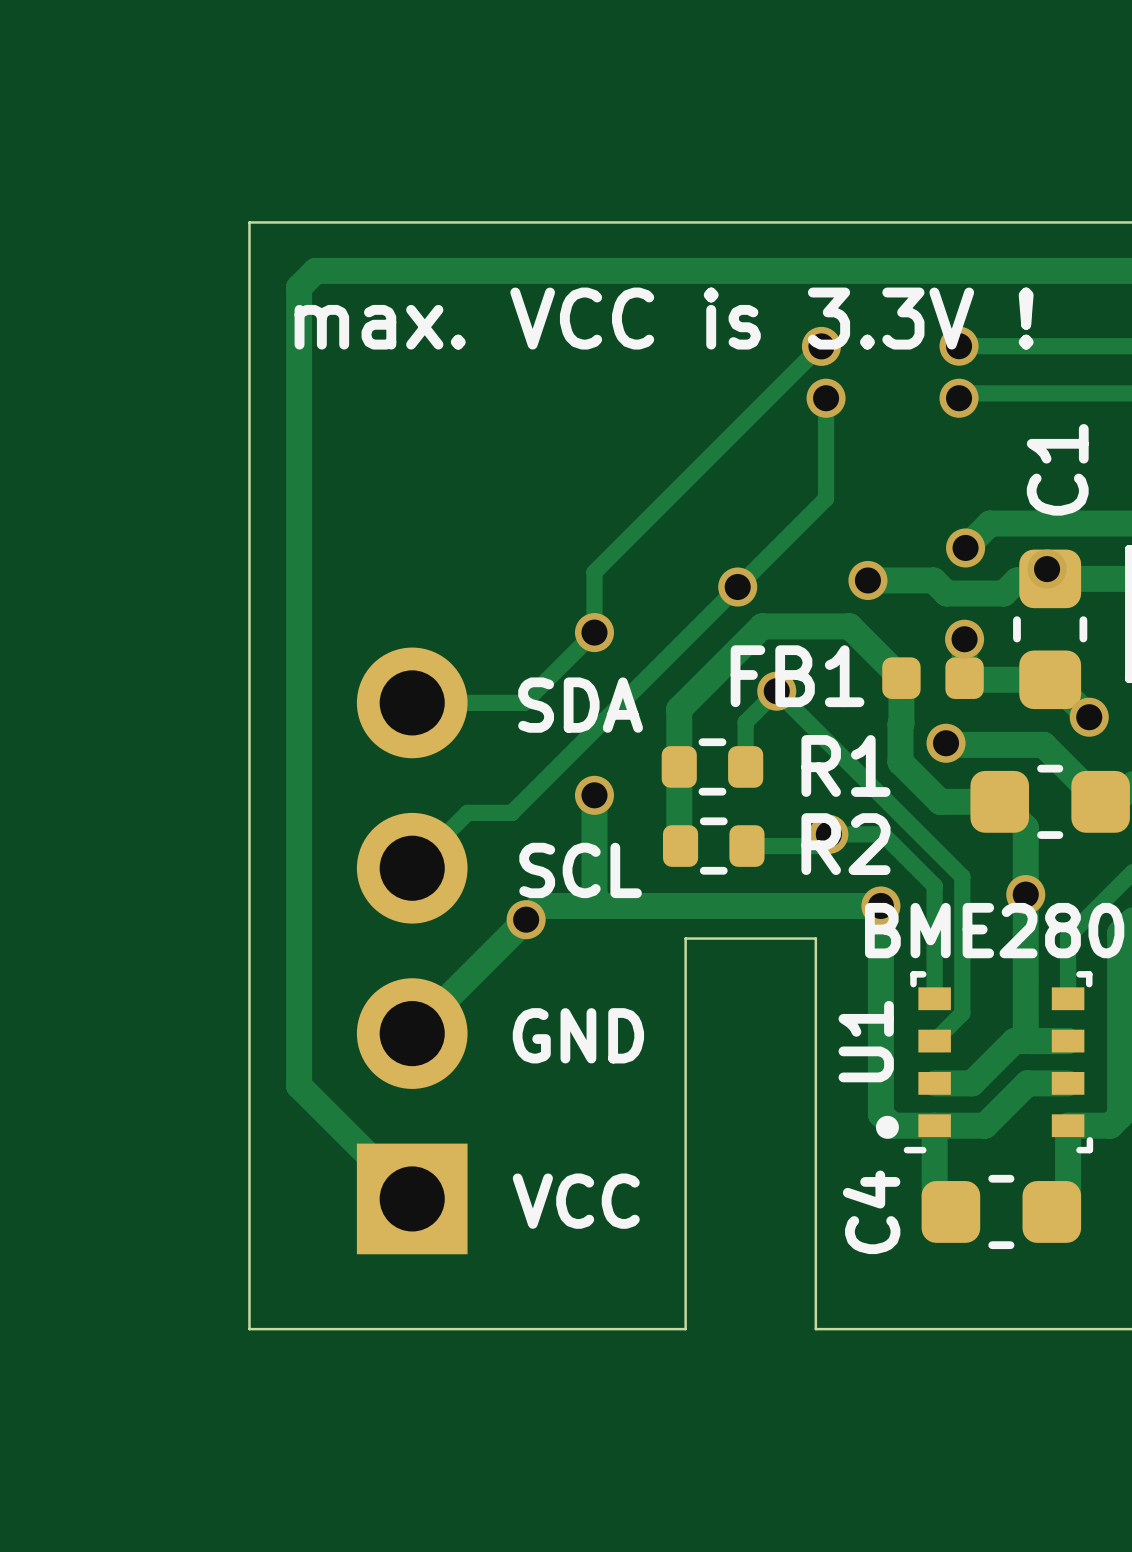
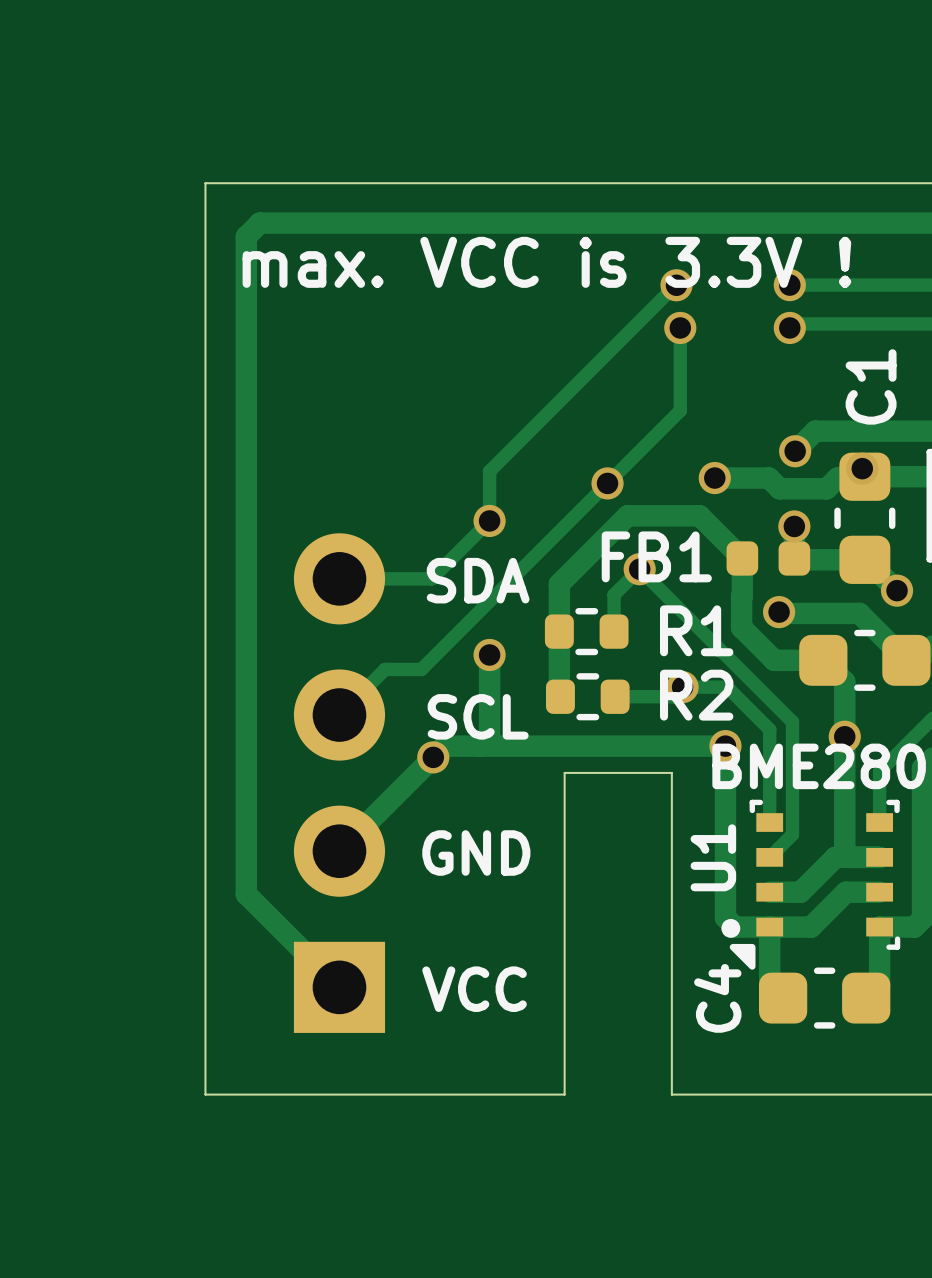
U1 footprint: [903, 971, 1094, 1154] -> [729, 799, 901, 970]

